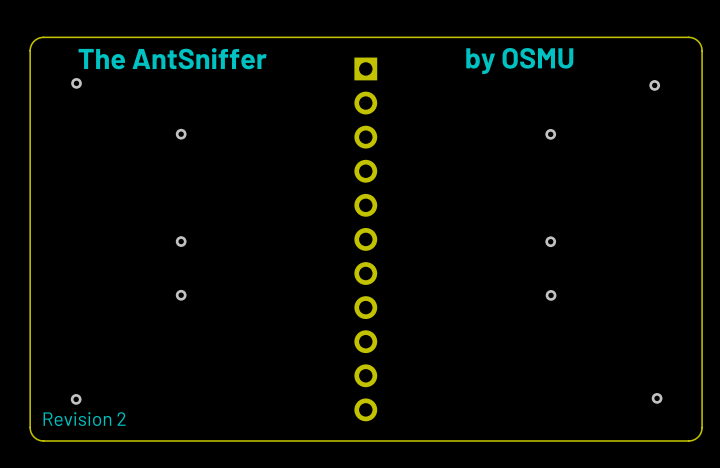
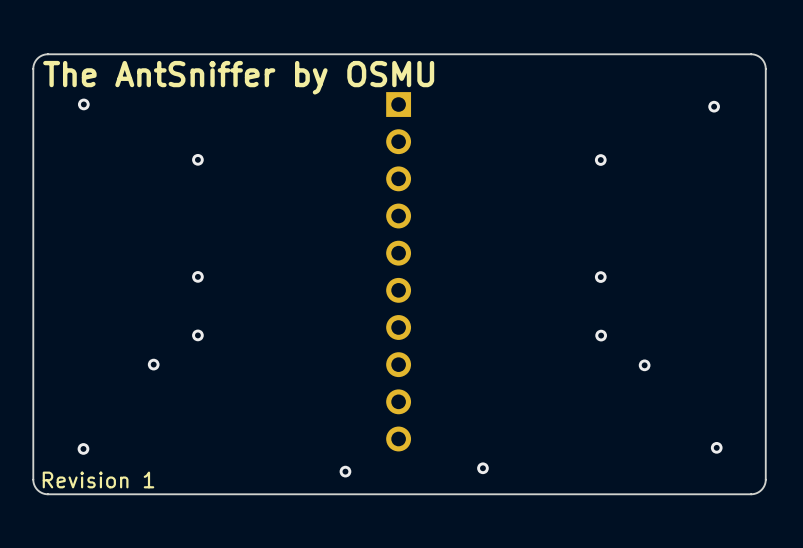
part footprint: [354, 57, 378, 422] -> [386, 92, 412, 452]
text: The AntSniffer (172, 58) -> The AntSniffer by OSMU (238, 77)
text: by OSMU (519, 61) -> none
via: none -> (153, 364)
via: none -> (644, 365)
via: none -> (482, 468)
text: Revision 2 (84, 419) -> Revision 1 (98, 479)
via: none -> (345, 471)

